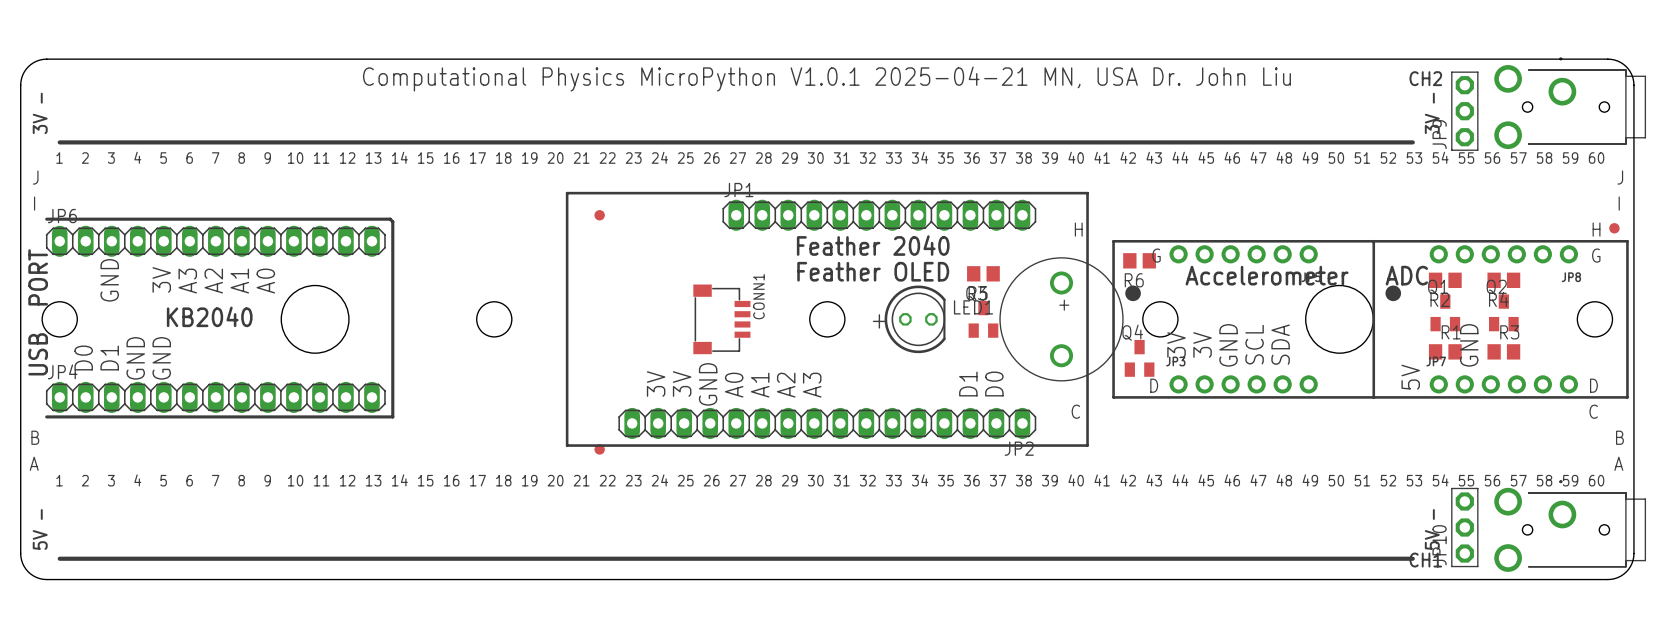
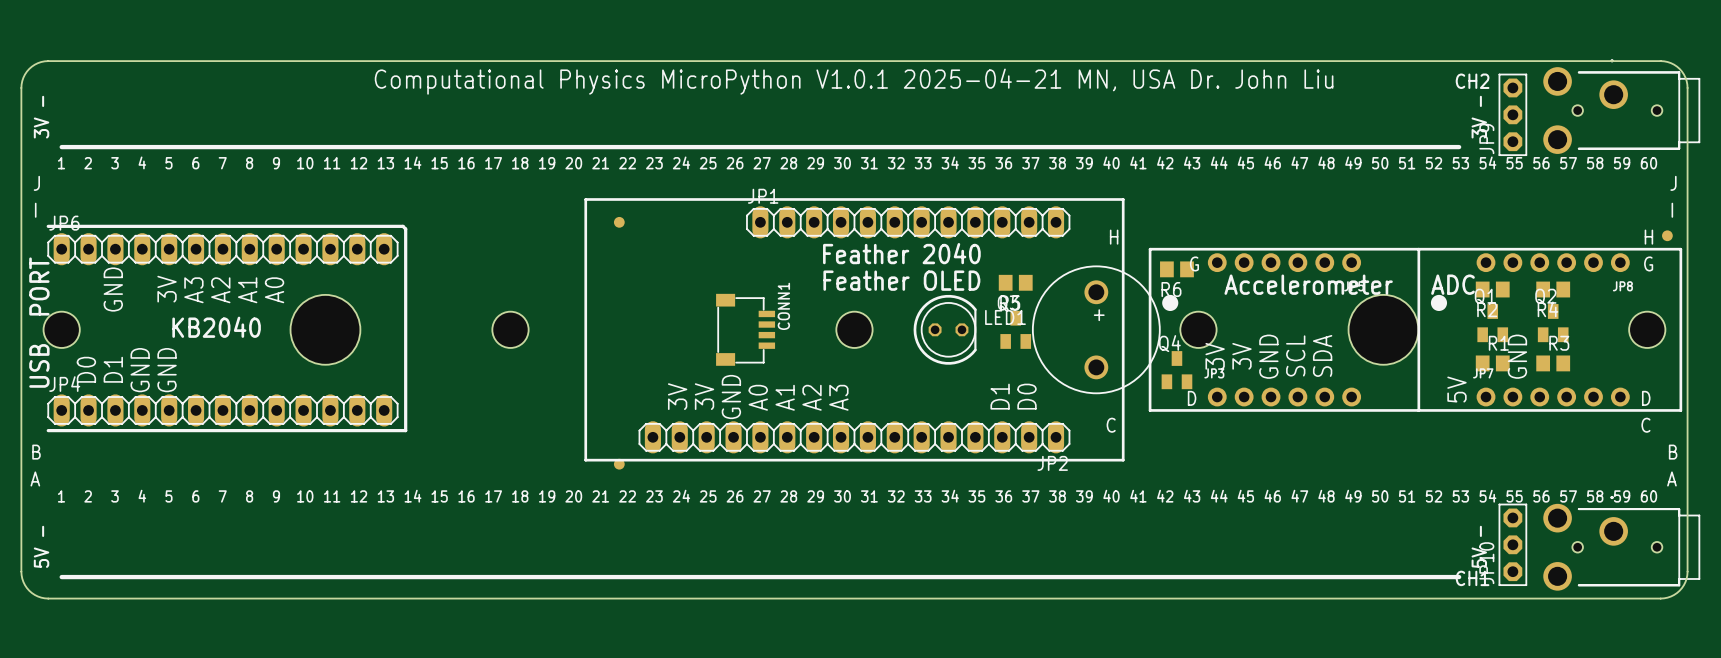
text: + (879, 321) -> none

